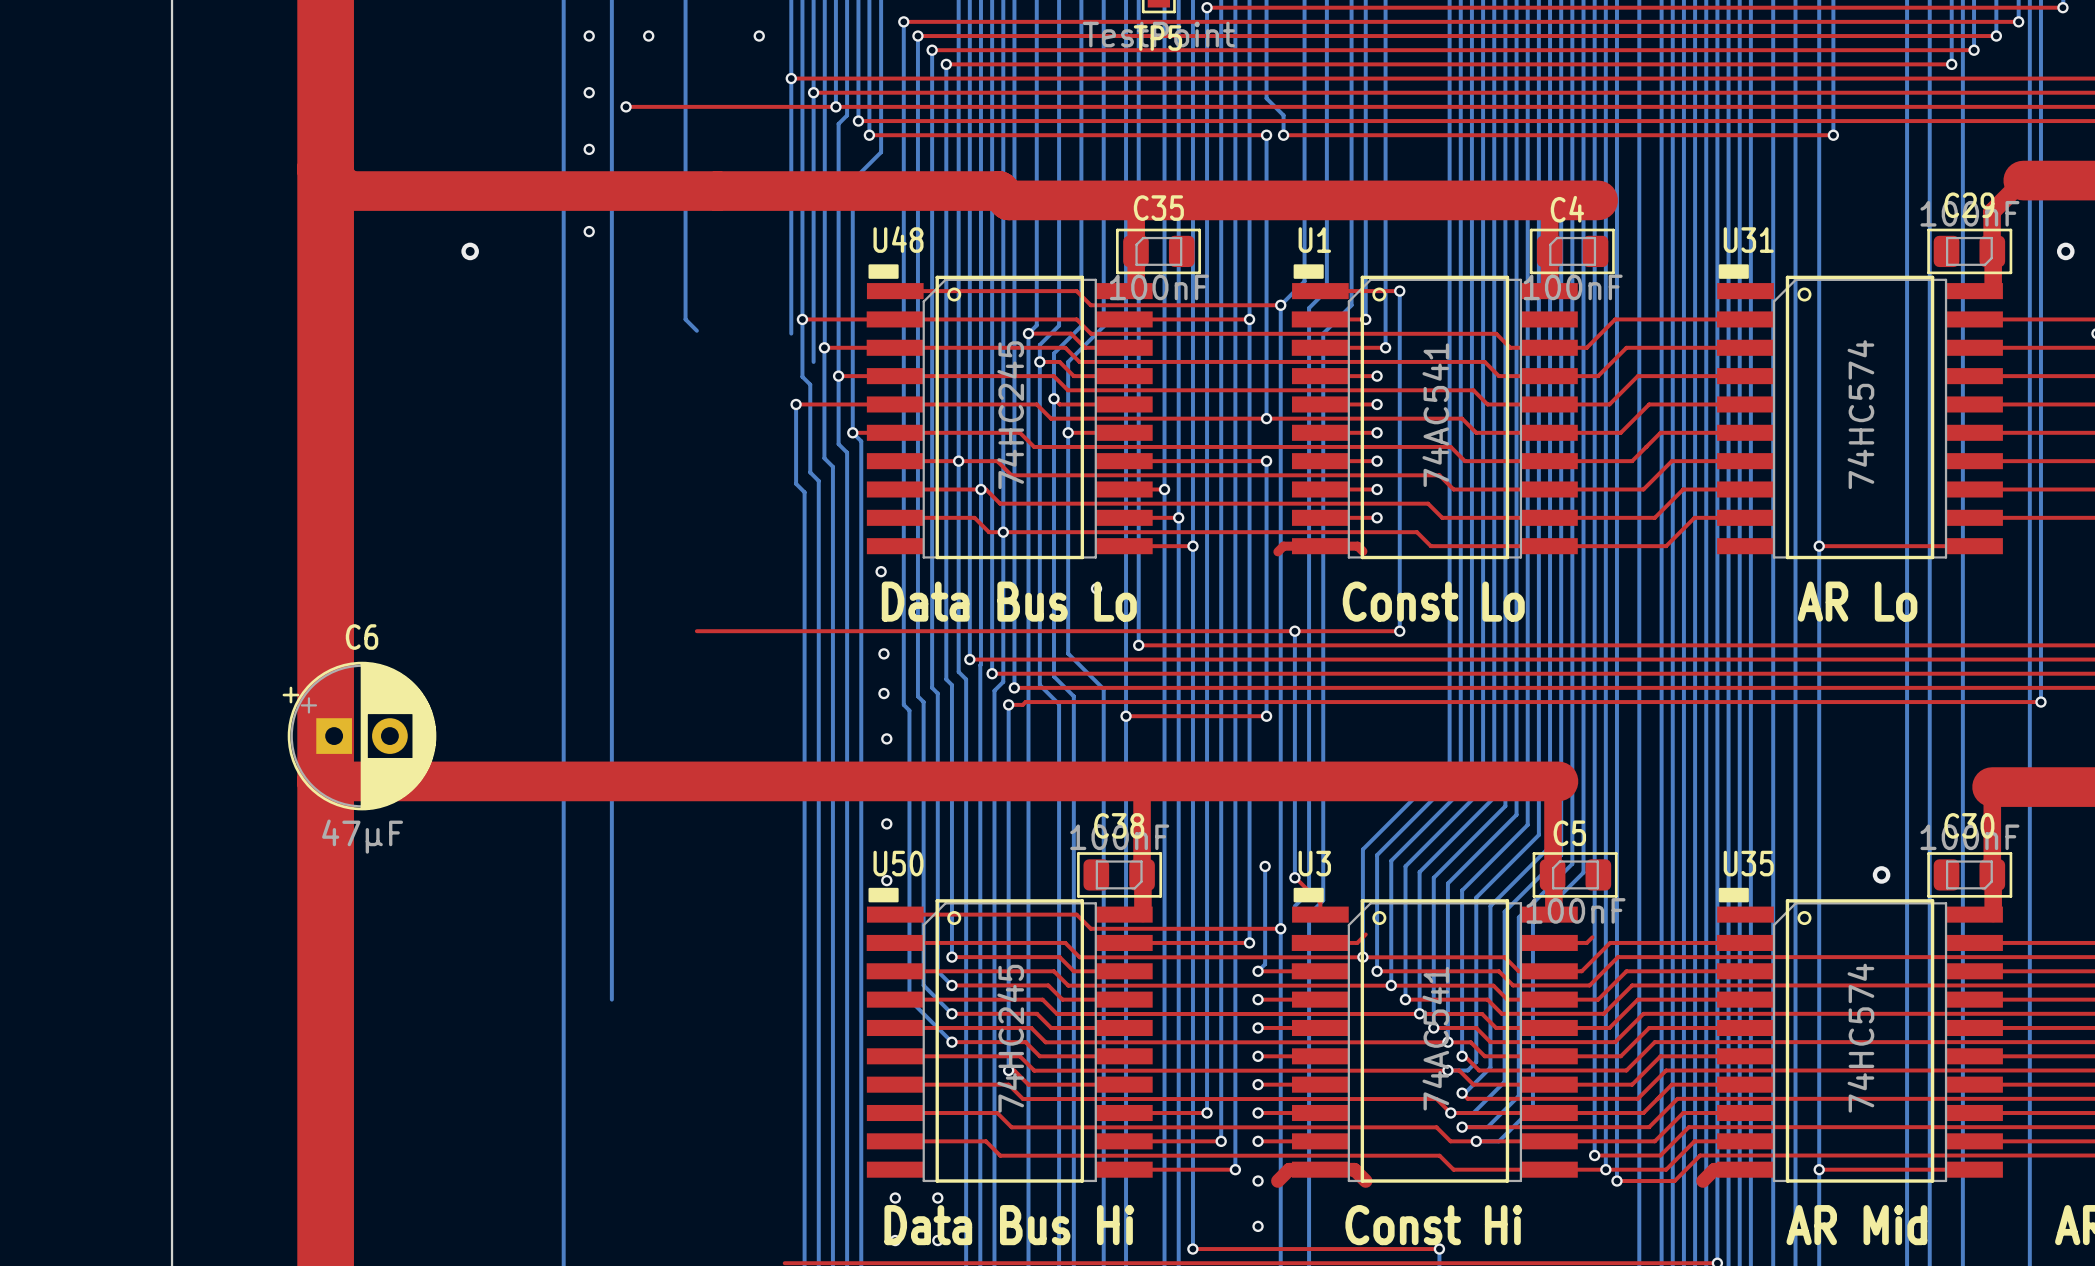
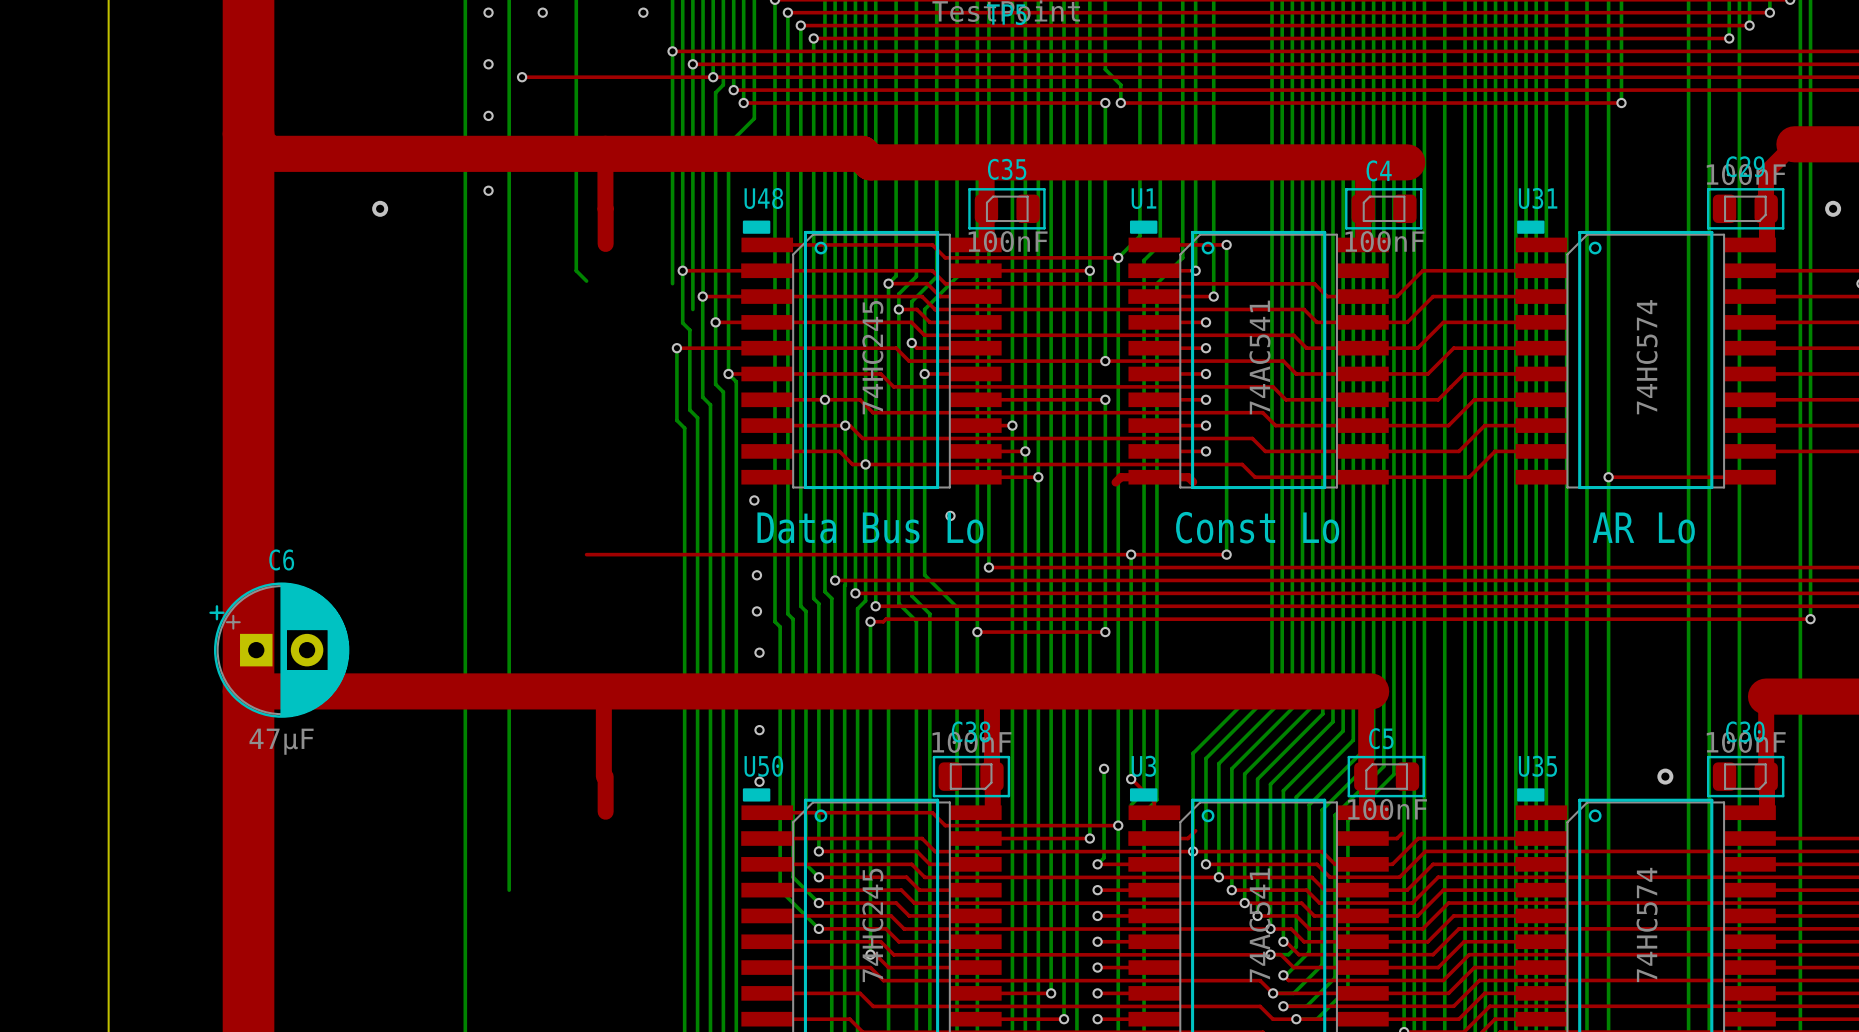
top track: none -> (605, 153) (605, 208)
top track: none -> (605, 208) (605, 243)
top track: none -> (602, 691) (603, 776)
top track: none -> (605, 776) (605, 811)

